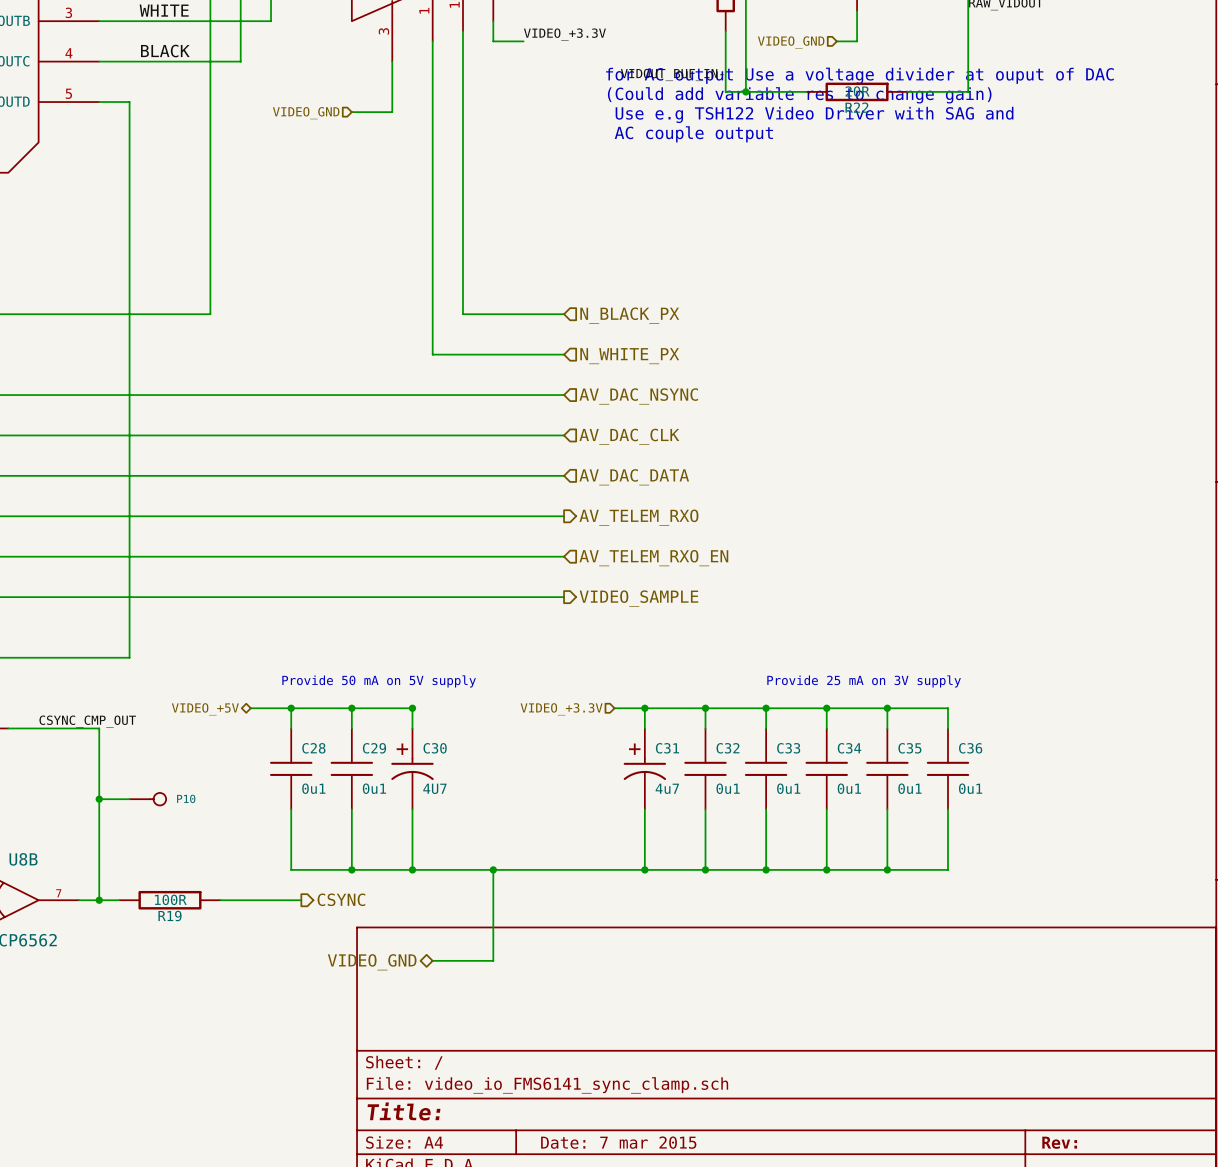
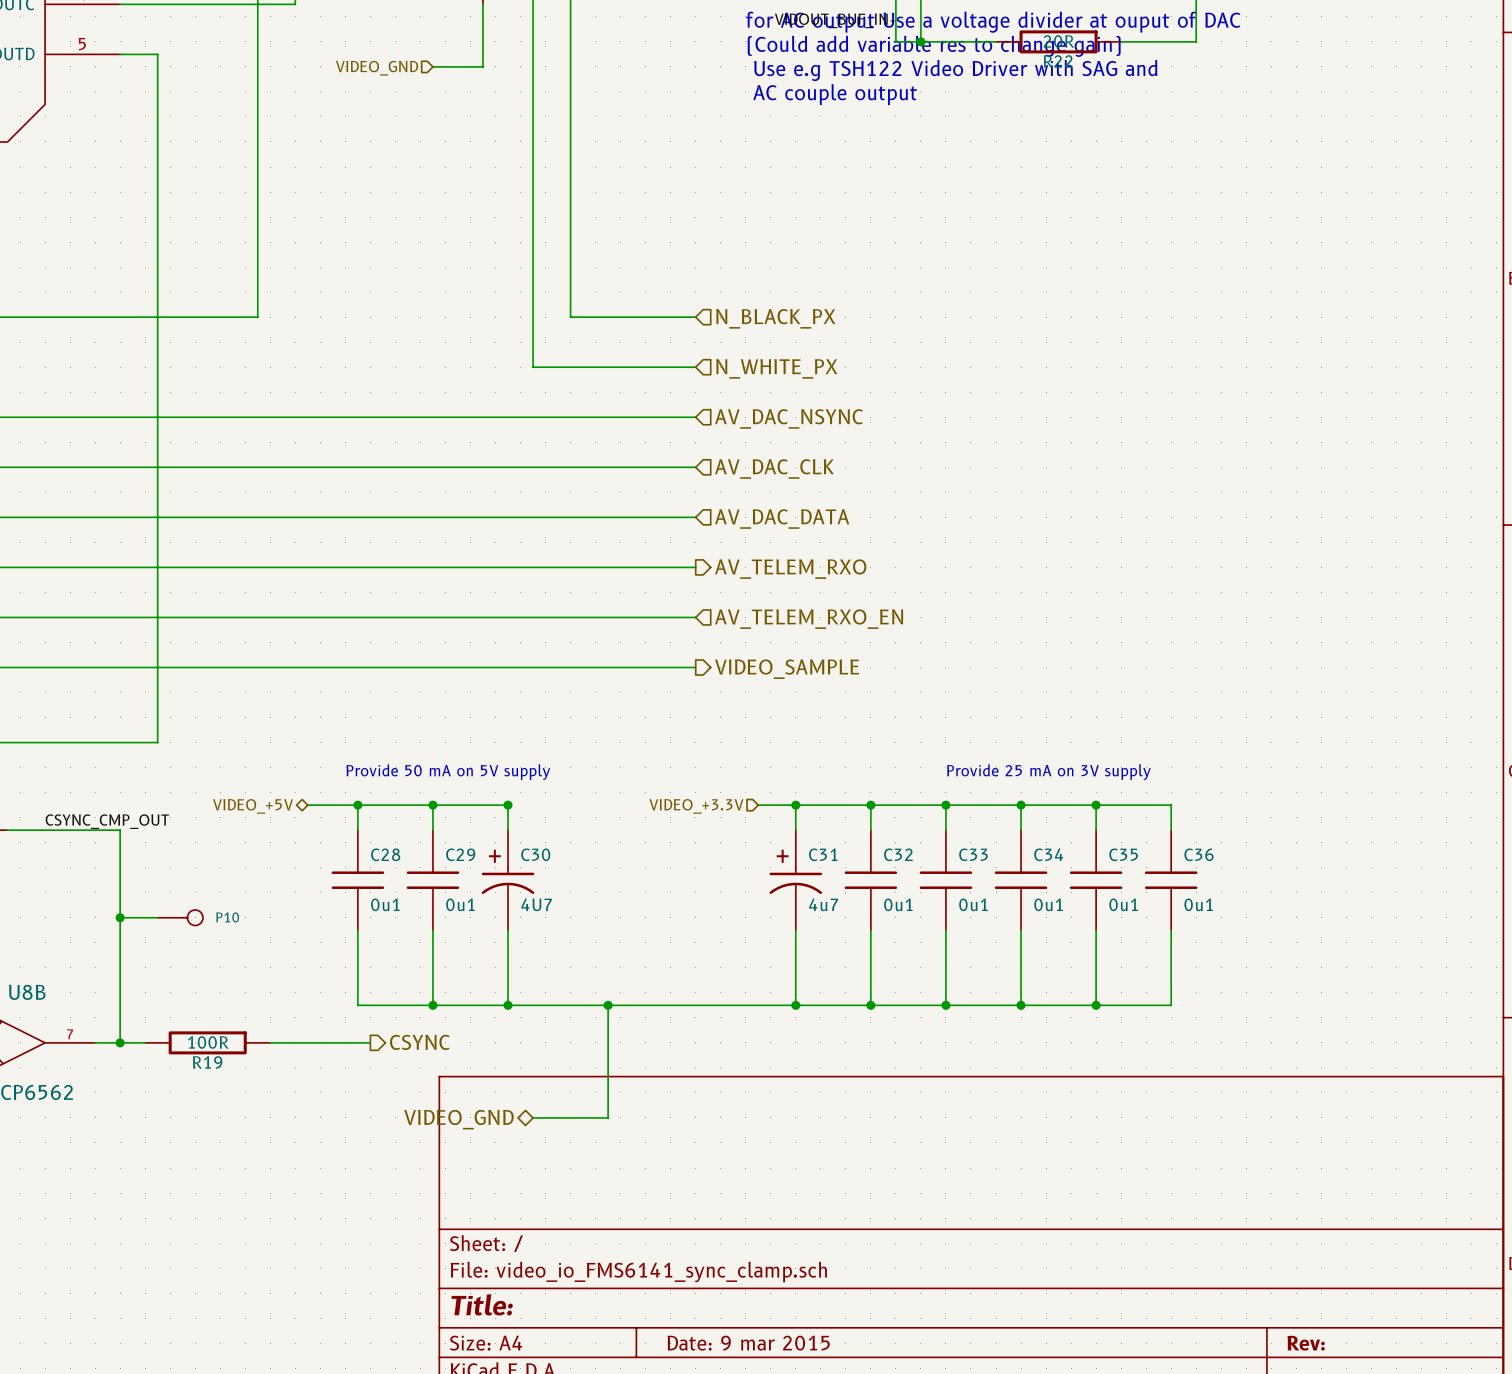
title block: Date: 7 mar 2015 (618, 1142) -> Date: 9 mar 2015 (748, 1343)

